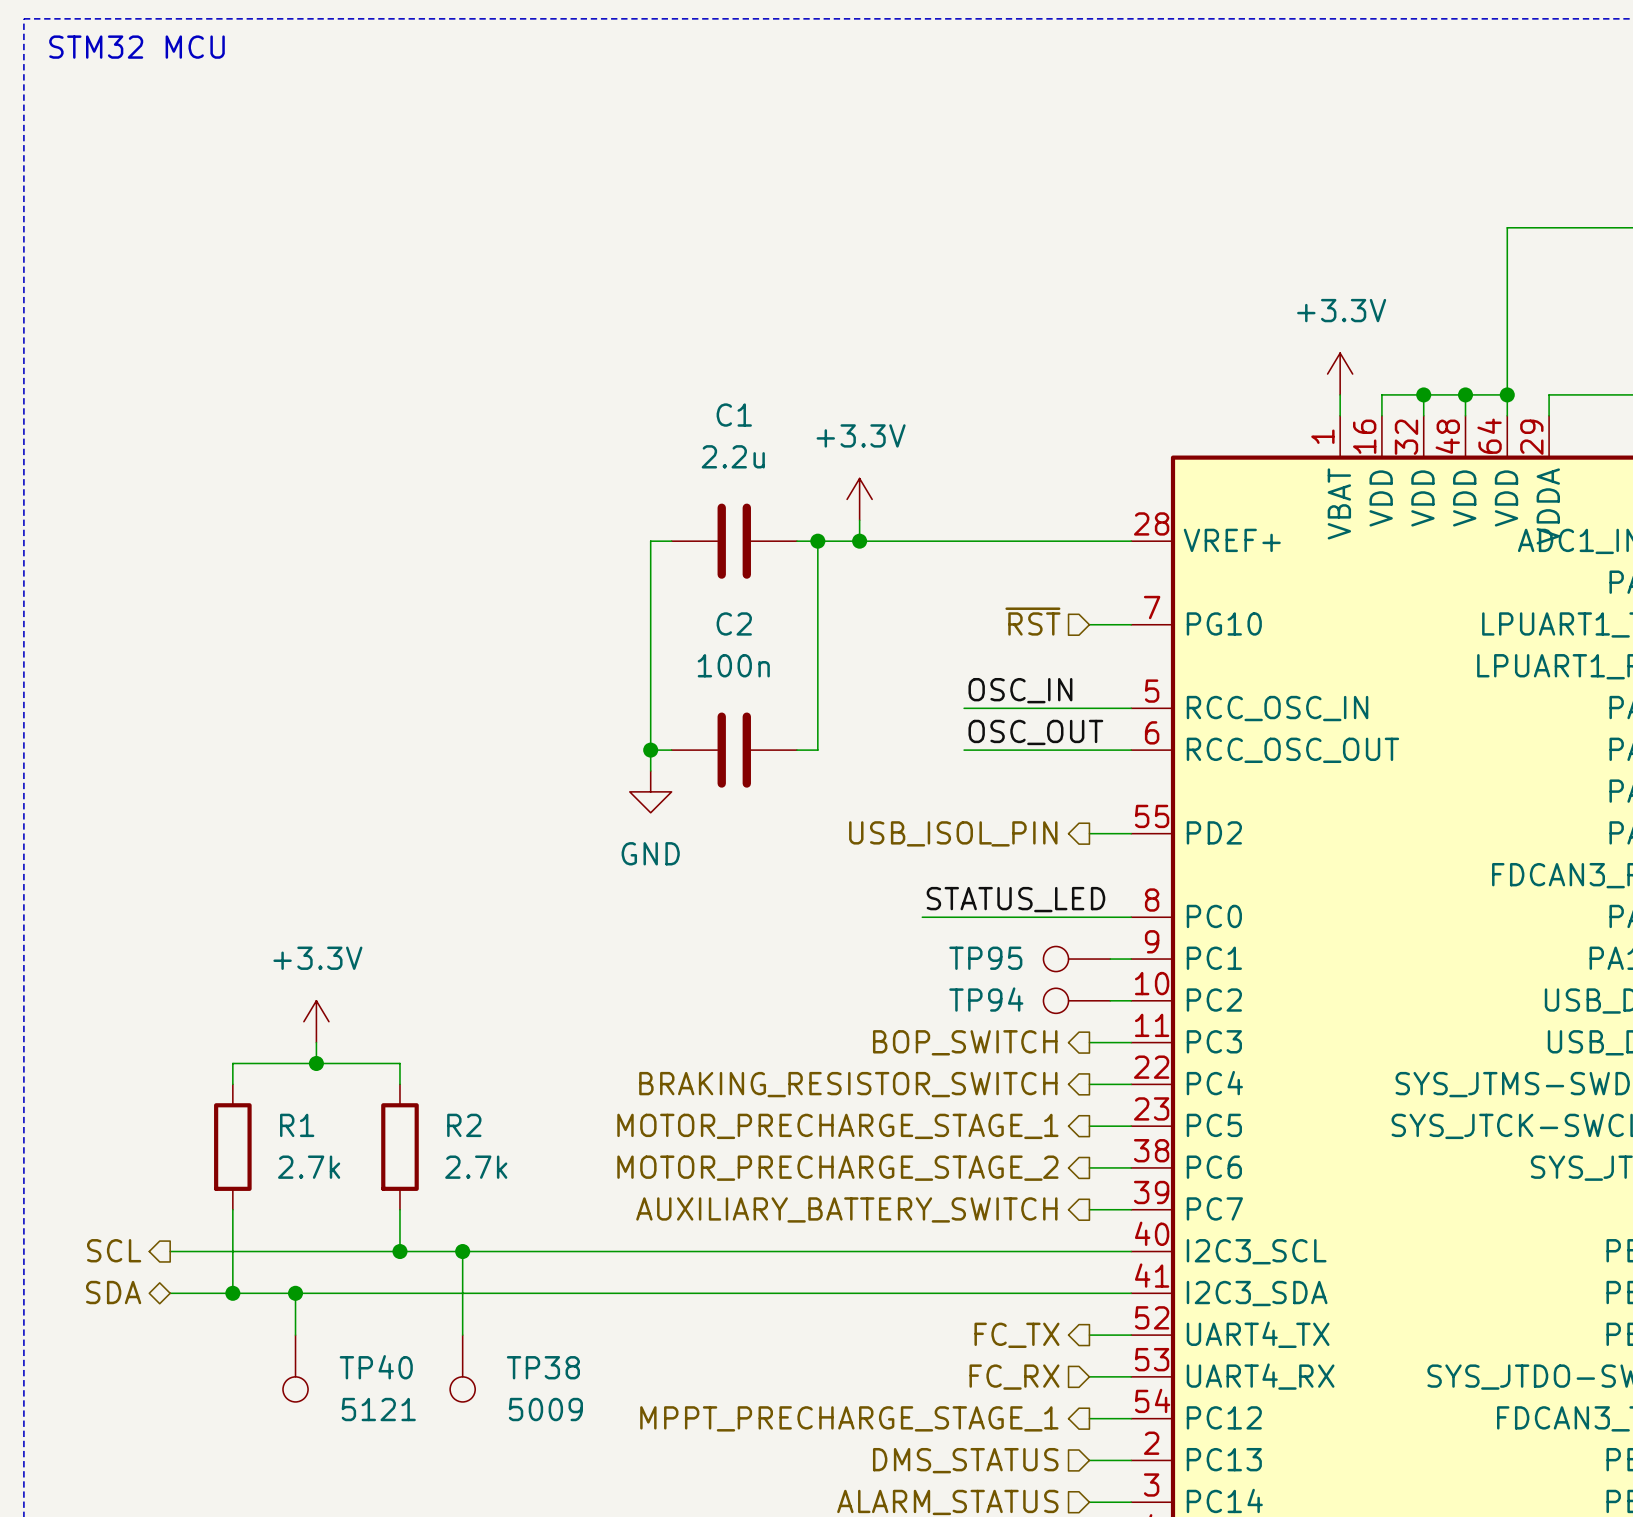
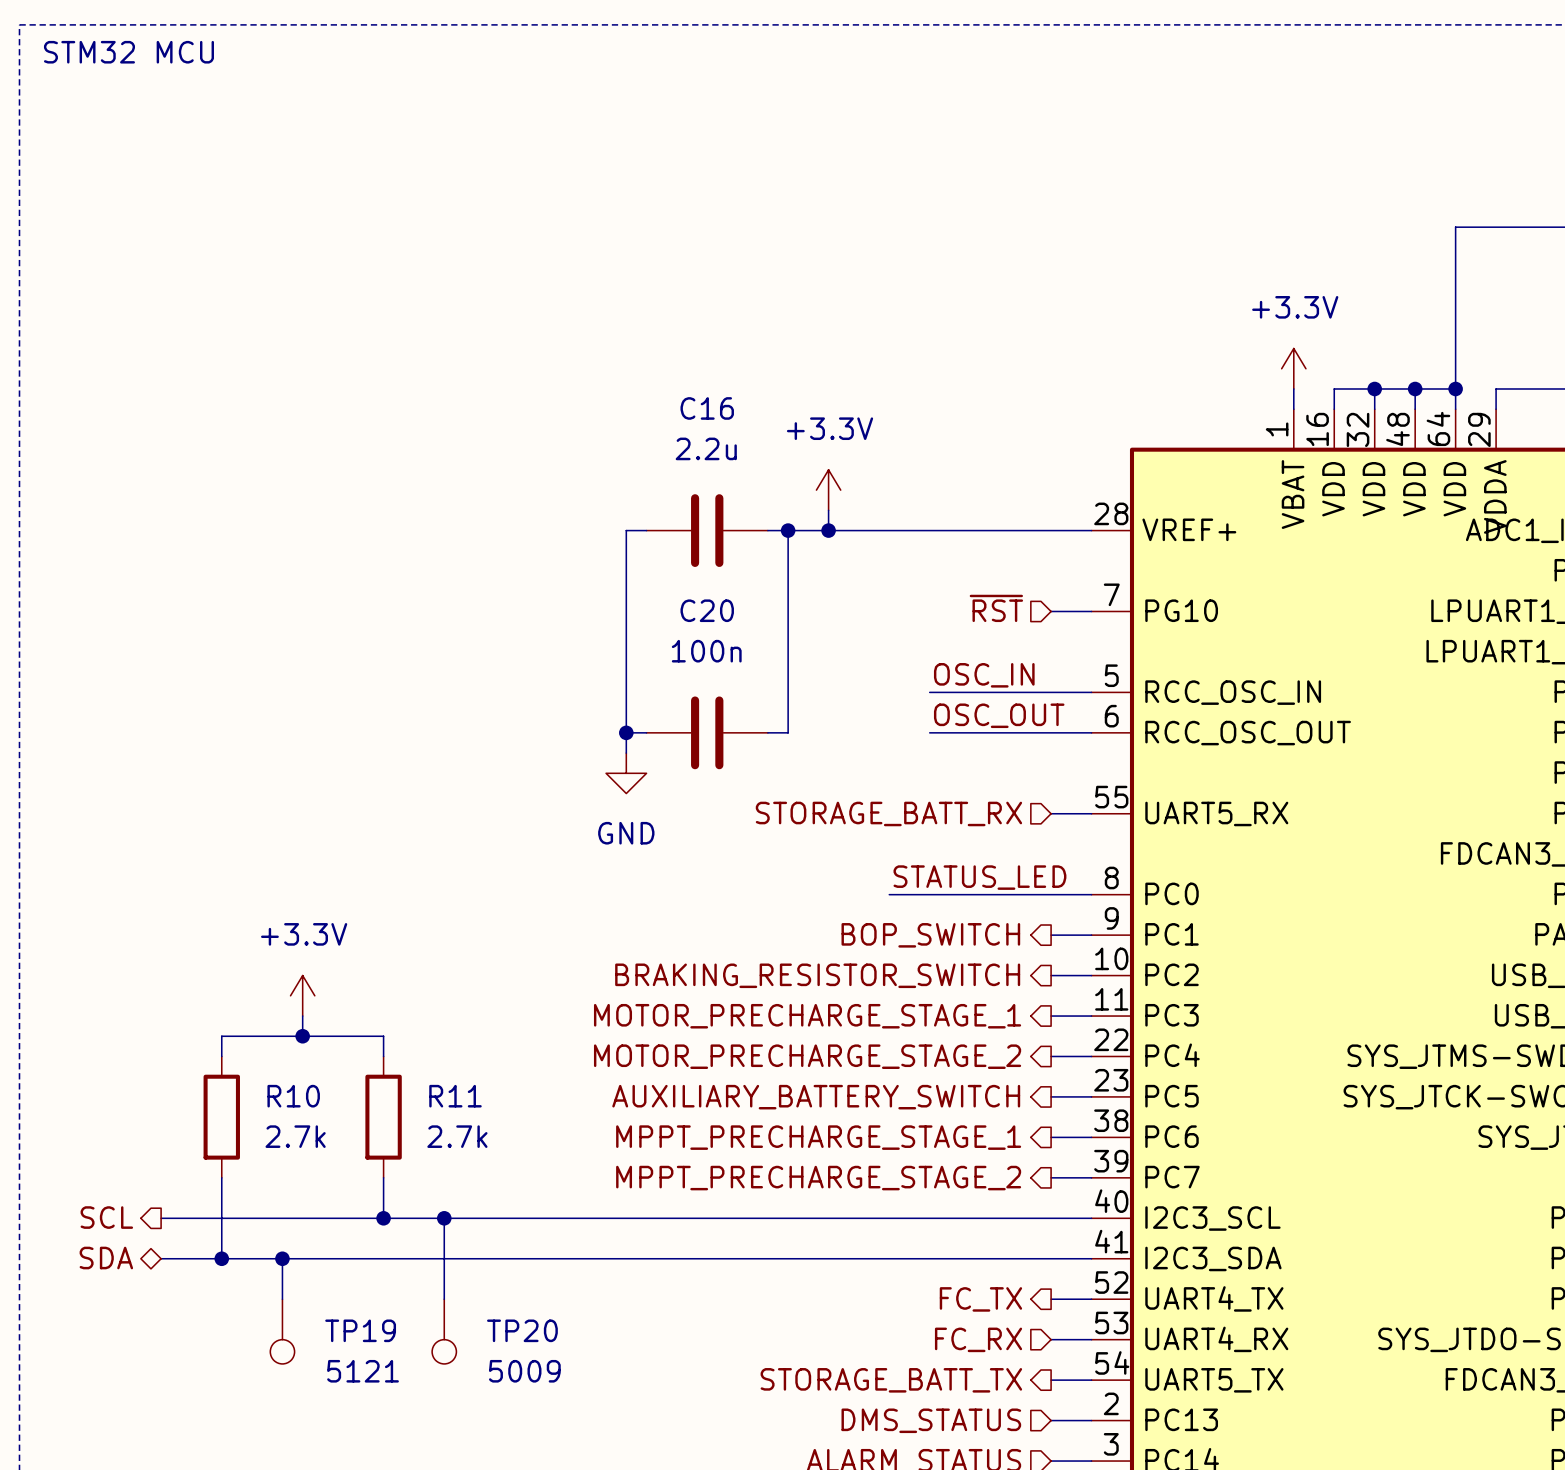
C1 name: C1 (734, 415) -> C16 (707, 408)
C2 name: C2 (734, 623) -> C20 (707, 610)
part pin name: PD2 (1214, 832) -> UART5_RX (1216, 813)
hierarchical label shape: output (953, 833) -> input (888, 813)
hierarchical label: USB_ISOL_PIN (953, 833) -> STORAGE_BATT_RX (888, 813)
hierarchical label: none -> BOP_SWITCH (930, 935)
TP95: (1076, 959) -> none
TP94: (1076, 1000) -> none
hierarchical label: none -> BRAKING_RESISTOR_SWITCH (817, 975)
hierarchical label: BOP_SWITCH (965, 1042) -> MOTOR_PRECHARGE_STAGE_1 (807, 1016)
hierarchical label: BRAKING_RESISTOR_SWITCH (848, 1084) -> MOTOR_PRECHARGE_STAGE_2 (807, 1056)
R1 name: R1 (297, 1125) -> R10 (293, 1096)
R2 name: R2 (464, 1125) -> R11 (455, 1096)
hierarchical label: MOTOR_PRECHARGE_STAGE_1 (837, 1126) -> AUXILIARY_BATTERY_SWITCH (816, 1097)
hierarchical label: MOTOR_PRECHARGE_STAGE_2 (837, 1168) -> MPPT_PRECHARGE_STAGE_1 (818, 1137)
hierarchical label: AUXILIARY_BATTERY_SWITCH (846, 1209) -> MPPT_PRECHARGE_STAGE_2 (818, 1178)
TP40 name: TP40 (376, 1367) -> TP19 (360, 1330)
TP38 name: TP38 (543, 1367) -> TP20 (522, 1330)
part pin name: PC12 (1224, 1417) -> UART5_TX (1214, 1380)
hierarchical label: MPPT_PRECHARGE_STAGE_1 (849, 1418) -> STORAGE_BATT_TX (891, 1380)

